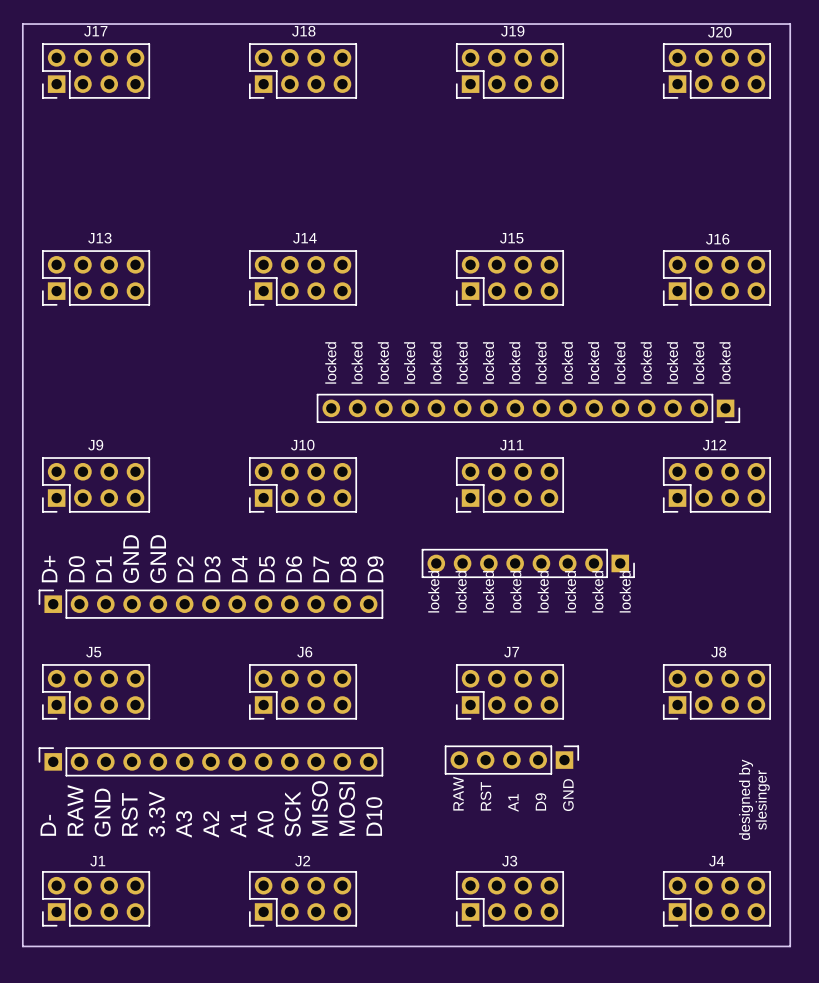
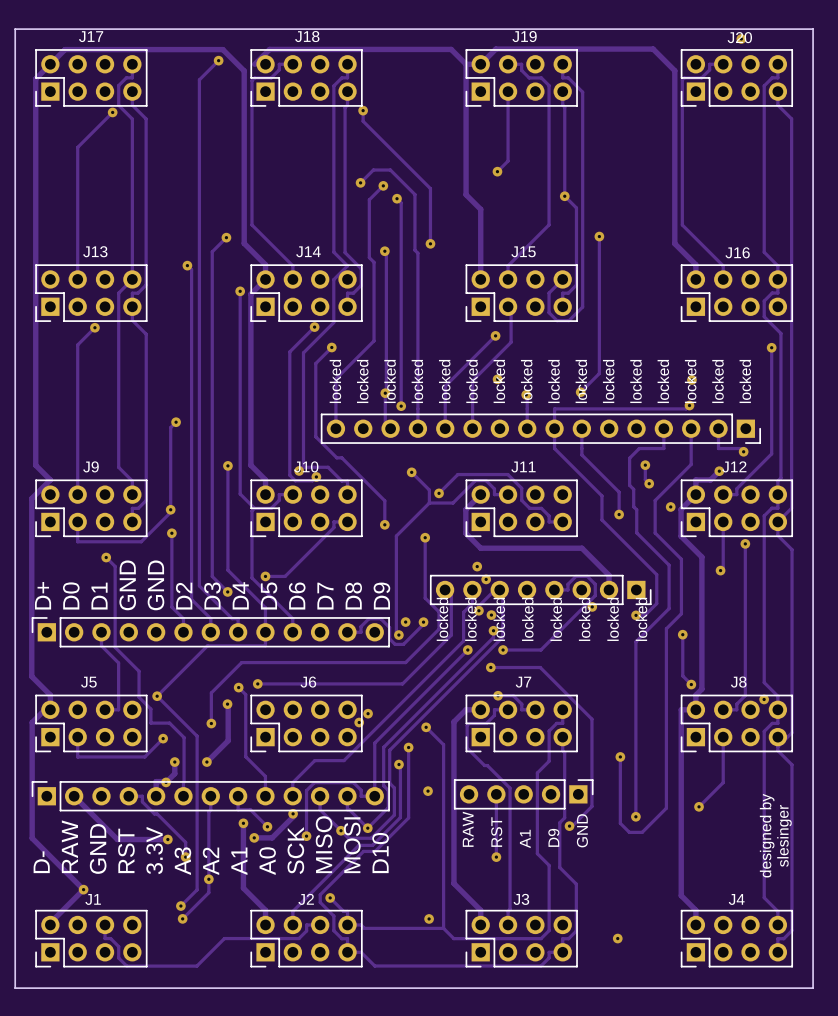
via: none -> (741, 38)
track: none -> (218, 60) (199, 79) (199, 585) (232, 618) (238, 618) (238, 632)
via: none -> (218, 60)
track: none -> (132, 64) (132, 77) (126, 77) (118, 85) (118, 105) (132, 119) (132, 279) (118, 293) (118, 467) (132, 481) (132, 494)
track: none -> (254, 64) (269, 49) (451, 49) (466, 64)
track: none -> (292, 64) (279, 64) (279, 69) (271, 77) (254, 77) (251, 80) (251, 224) (292, 265) (292, 279)
track: none -> (347, 64) (347, 77) (341, 77) (333, 85) (333, 252) (347, 265) (333, 279) (333, 322) (303, 352) (303, 467)
track: none -> (466, 64) (480, 64) (495, 49) (653, 49) (674, 70) (674, 243) (695, 264) (695, 279)
track: none -> (466, 64) (466, 194) (480, 209) (480, 279)
track: none -> (508, 64) (521, 64) (521, 70) (529, 77) (541, 77) (549, 85) (549, 224) (508, 265) (508, 279)
track: none -> (562, 64) (562, 77) (568, 77) (582, 92) (582, 307) (568, 320) (557, 320) (549, 312) (549, 293) (562, 279)
track: none -> (723, 64) (709, 64) (709, 69) (701, 77) (684, 77) (682, 79) (682, 224) (723, 265) (723, 279)
track: none -> (777, 64) (777, 77) (772, 77) (764, 85) (764, 252) (777, 265) (777, 293) (772, 293) (764, 301) (764, 316) (780, 333) (780, 477) (777, 481) (777, 508) (771, 508) (764, 515) (764, 682) (777, 696) (777, 723) (772, 723) (764, 731) (764, 897) (777, 911) (777, 924)
track: none -> (132, 91) (132, 105) (146, 118) (146, 285) (137, 293) (132, 293) (132, 320) (146, 334) (146, 500) (138, 508) (132, 508) (132, 521)
track: none -> (347, 91) (347, 105) (345, 107) (345, 252) (361, 268) (361, 285) (353, 293) (347, 293) (347, 306)
track: none -> (508, 91) (508, 161) (497, 171)
track: none -> (562, 91) (562, 105) (564, 107) (564, 196) (576, 207) (576, 285) (568, 293) (562, 293) (562, 306)
track: none -> (777, 91) (777, 105) (791, 118) (791, 508) (777, 521) (777, 535) (792, 549) (792, 732) (777, 746)
track: none -> (363, 110) (363, 121) (430, 188) (430, 243)
via: none -> (363, 110)
track: none -> (112, 112) (77, 147) (77, 279)
via: none -> (112, 112)
via: none -> (497, 171)
track: none -> (360, 182) (373, 170) (390, 170) (414, 194) (414, 250) (417, 253) (417, 428)
via: none -> (360, 182)
track: none -> (383, 185) (369, 199) (369, 257) (374, 262) (374, 340) (335, 379) (335, 428)
via: none -> (383, 185)
via: none -> (564, 196)
track: none -> (397, 198) (401, 202) (401, 406)
via: none -> (397, 198)
track: none -> (599, 236) (599, 373) (580, 392)
via: none -> (599, 236)
track: none -> (226, 237) (212, 251) (212, 576) (227, 591)
via: none -> (226, 237)
via: none -> (430, 243)
track: none -> (384, 251) (386, 252) (385, 423) (390, 428)
via: none -> (384, 251)
track: none -> (187, 265) (191, 269) (191, 599) (210, 618) (210, 632)
via: none -> (187, 265)
track: none -> (240, 291) (240, 493) (254, 508)
via: none -> (240, 291)
track: none -> (508, 306) (511, 309) (511, 342) (472, 380) (472, 428)
track: none -> (314, 327) (289, 351) (289, 475) (295, 480) (312, 480) (316, 476)
via: none -> (314, 327)
track: none -> (94, 327) (77, 344) (77, 494)
via: none -> (94, 327)
track: none -> (495, 335) (445, 386) (445, 428)
via: none -> (495, 335)
track: none -> (331, 347) (315, 363) (315, 436) (336, 457) (341, 457) (384, 500) (384, 524)
via: none -> (331, 347)
track: none -> (771, 347) (771, 453) (736, 488) (736, 494) (723, 494)
via: none -> (771, 347)
via: none -> (497, 379)
via: none -> (691, 379)
via: none -> (580, 392)
via: none -> (385, 393)
track: none -> (526, 394) (527, 428)
via: none -> (526, 394)
via: none -> (401, 406)
track: none -> (689, 405) (686, 408) (554, 408) (554, 448) (601, 495) (601, 519) (656, 574) (656, 603) (644, 615) (636, 615)
via: none -> (689, 405)
track: none -> (176, 422) (170, 427) (170, 512) (141, 541) (77, 541) (77, 521)
via: none -> (176, 422)
track: none -> (581, 428) (581, 454) (619, 492) (619, 514)
track: none -> (663, 428) (663, 448) (639, 448) (629, 458) (629, 485) (633, 489) (633, 506) (636, 509) (636, 532) (669, 565) (669, 608) (635, 641) (635, 816)
track: none -> (691, 428) (691, 464) (655, 500) (655, 533) (681, 559) (681, 613) (666, 628) (666, 808) (642, 832) (629, 832) (620, 823) (620, 756)
track: none -> (718, 428) (718, 448) (740, 448) (743, 451)
via: none -> (743, 451)
track: none -> (645, 465) (645, 479) (649, 483)
via: none -> (645, 465)
track: none -> (227, 465) (227, 570) (265, 607) (265, 645) (207, 645) (157, 696) (197, 736) (197, 889) (180, 906)
via: none -> (227, 465)
track: none -> (299, 470) (302, 467) (328, 467) (341, 481) (347, 481) (347, 494)
via: none -> (299, 470)
track: none -> (719, 471) (710, 479) (695, 479) (695, 494) (681, 509) (681, 536) (701, 557) (701, 689) (695, 695) (695, 709) (681, 709) (681, 895) (695, 910) (695, 924)
via: none -> (719, 471)
track: none -> (411, 472) (429, 490) (429, 503)
via: none -> (411, 472)
via: none -> (316, 476)
via: none -> (649, 483)
track: none -> (439, 493) (457, 474) (507, 474) (521, 488) (521, 500) (529, 508) (541, 508) (549, 516) (549, 521) (562, 521)
via: none -> (439, 493)
track: none -> (265, 494) (265, 479) (250, 465) (250, 294) (265, 279) (265, 264) (244, 243) (244, 70) (222, 49) (65, 49) (35, 78) (35, 465) (50, 479) (31, 498) (31, 676) (50, 695) (50, 709)
track: none -> (292, 494) (279, 494) (279, 500) (271, 508) (254, 508)
track: none -> (480, 494) (465, 509) (465, 533) (480, 548) (581, 548) (609, 575) (609, 589)
track: none -> (508, 494) (494, 494) (494, 489) (486, 480) (475, 480) (453, 503) (429, 503)
track: none -> (429, 503) (396, 536) (396, 632) (398, 635)
via: none -> (670, 506)
track: none -> (254, 508) (251, 510) (251, 577) (292, 618) (292, 632)
via: none -> (170, 509)
via: none -> (619, 514)
track: none -> (347, 521) (333, 521) (333, 527) (285, 576) (265, 576)
track: none -> (723, 521) (723, 567) (720, 570)
via: none -> (384, 524)
track: none -> (171, 533) (171, 607) (183, 618) (183, 632)
via: none -> (171, 533)
track: none -> (425, 537) (425, 598) (439, 611) (439, 629) (405, 662) (241, 662) (211, 692) (211, 723)
via: none -> (425, 537)
track: none -> (745, 543) (745, 695) (736, 704) (736, 709) (723, 709)
via: none -> (745, 543)
track: none -> (106, 557) (115, 566) (115, 647) (139, 671) (139, 697) (150, 709) (150, 723) (169, 723) (184, 737) (183, 796)
via: none -> (106, 557)
via: none -> (477, 566)
via: none -> (720, 570)
via: none -> (265, 576)
via: none -> (486, 579)
track: none -> (445, 589) (451, 596) (451, 635) (402, 683) (257, 683)
track: none -> (472, 589) (472, 603) (463, 612) (463, 640) (344, 760) (314, 760) (292, 782) (292, 796)
track: none -> (494, 589) (478, 606) (478, 610)
track: none -> (498, 589) (502, 593) (502, 637) (389, 750) (389, 783) (394, 787) (394, 815) (371, 838) (348, 838) (320, 809) (320, 796)
track: none -> (554, 589) (567, 589) (567, 584) (575, 576) (587, 576) (595, 584) (595, 595) (540, 650) (503, 650)
via: none -> (227, 591)
via: none -> (592, 606)
via: none -> (478, 610)
via: none -> (491, 615)
via: none -> (636, 615)
via: none -> (405, 622)
track: none -> (423, 622) (403, 644) (395, 644) (389, 638) (389, 627) (380, 618) (368, 618) (361, 626) (361, 632) (347, 632)
via: none -> (423, 622)
track: none -> (493, 630) (493, 637) (383, 747) (383, 785) (388, 790) (388, 807) (367, 828) (347, 809) (347, 796)
via: none -> (493, 630)
track: none -> (101, 632) (101, 645) (118, 662) (118, 709) (105, 709)
via: none -> (398, 635)
track: none -> (682, 634) (682, 675) (691, 684)
via: none -> (682, 634)
track: none -> (467, 650) (374, 743) (374, 796) (361, 796) (361, 790) (353, 782) (314, 782) (306, 790) (306, 836)
via: none -> (467, 650)
via: none -> (503, 650)
track: none -> (490, 667) (540, 667) (591, 719) (591, 806) (572, 826) (569, 826)
via: none -> (490, 667)
via: none -> (257, 683)
via: none -> (691, 684)
track: none -> (238, 687) (245, 694) (245, 756) (265, 776) (265, 796)
via: none -> (238, 687)
via: none -> (157, 696)
track: none -> (498, 695) (513, 695) (521, 704) (521, 709) (535, 709)
via: none -> (498, 695)
via: none -> (764, 699)
track: none -> (50, 704) (32, 722) (32, 838) (83, 889) (50, 924)
track: none -> (227, 704) (228, 740) (206, 762)
via: none -> (227, 704)
track: none -> (480, 709) (466, 709) (453, 721) (453, 883) (480, 910) (480, 924)
track: none -> (508, 709) (494, 709) (494, 715) (486, 723) (469, 723) (467, 725) (467, 748) (510, 788) (510, 909) (508, 911) (508, 924)
track: none -> (562, 709) (562, 723) (556, 723) (549, 731) (549, 761) (537, 772) (537, 853) (549, 865) (549, 930) (541, 938) (453, 938) (443, 928)
via: none -> (368, 713)
via: none -> (359, 722)
via: none -> (211, 723)
track: none -> (426, 727) (443, 744) (443, 928)
via: none -> (426, 727)
track: none -> (77, 737) (77, 756) (144, 756) (163, 738)
track: none -> (562, 737) (562, 750) (564, 752) (564, 817) (559, 822) (559, 867) (576, 884) (576, 931) (568, 938) (562, 938) (562, 952) (549, 952) (549, 957) (541, 966) (374, 966) (361, 952) (347, 952) (347, 938) (341, 938) (333, 930) (333, 916) (320, 902) (320, 894) (363, 851) (375, 851) (408, 817) (408, 747)
track: none -> (723, 737) (723, 782) (699, 806)
track: none -> (777, 737) (777, 750) (791, 764) (791, 930) (783, 938) (777, 938) (777, 952)
via: none -> (163, 738)
via: none -> (408, 747)
via: none -> (620, 756)
track: none -> (174, 762) (174, 773) (166, 782) (156, 781) (156, 796)
via: none -> (174, 762)
via: none -> (206, 762)
track: none -> (398, 764) (400, 817) (372, 845) (358, 845) (292, 911) (292, 924)
via: none -> (398, 764)
via: none -> (166, 782)
via: none -> (428, 791)
track: none -> (496, 794) (496, 857)
track: none -> (74, 796) (117, 839) (167, 839)
track: none -> (128, 796) (142, 796) (142, 801) (185, 842) (185, 857)
track: none -> (210, 796) (210, 809) (208, 811) (208, 892) (182, 918)
track: none -> (238, 796) (238, 809) (250, 809) (267, 826)
via: none -> (699, 806)
track: none -> (293, 813) (293, 816) (272, 837) (254, 837)
via: none -> (293, 813)
via: none -> (635, 816)
track: none -> (243, 823) (243, 888) (265, 910) (265, 924)
via: none -> (243, 823)
via: none -> (569, 826)
via: none -> (267, 826)
via: none -> (367, 828)
via: none -> (341, 830)
via: none -> (306, 836)
via: none -> (254, 837)
via: none -> (167, 839)
via: none -> (185, 857)
via: none -> (496, 857)
via: none -> (208, 879)
via: none -> (83, 889)
track: none -> (330, 897) (343, 911) (347, 911) (347, 924) (361, 924) (364, 928) (443, 928)
via: none -> (330, 897)
via: none -> (180, 906)
via: none -> (182, 918)
via: none -> (429, 918)
track: none -> (105, 924) (105, 938) (110, 938) (118, 946) (118, 958) (126, 966) (196, 966) (224, 938) (299, 938) (306, 930) (306, 924) (320, 924)
via: none -> (617, 938)

